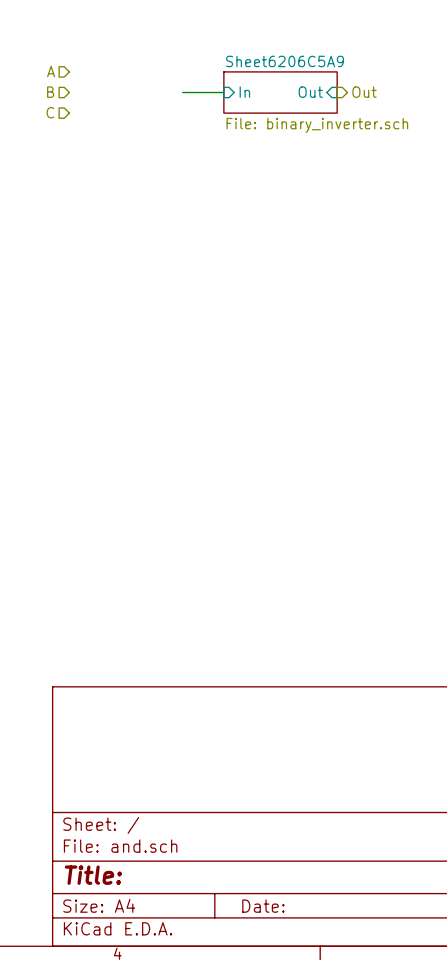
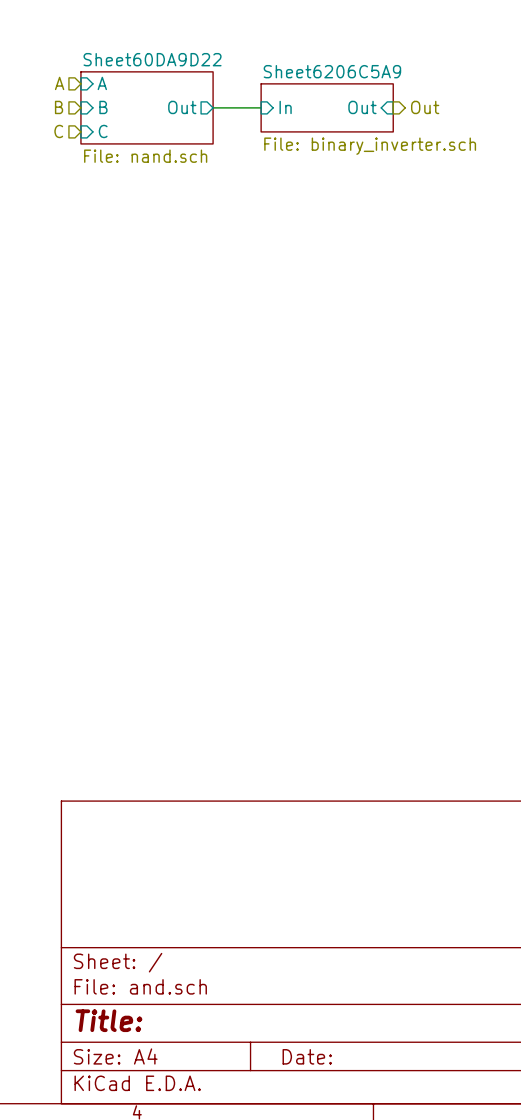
sheet pin: none -> A (102, 83)
sheet pin: none -> B (103, 107)
sheet Sheet60DA9D22: none -> File: nand.sch (147, 107)
sheet pin: none -> Out (182, 107)
sheet pin: none -> C (103, 131)

